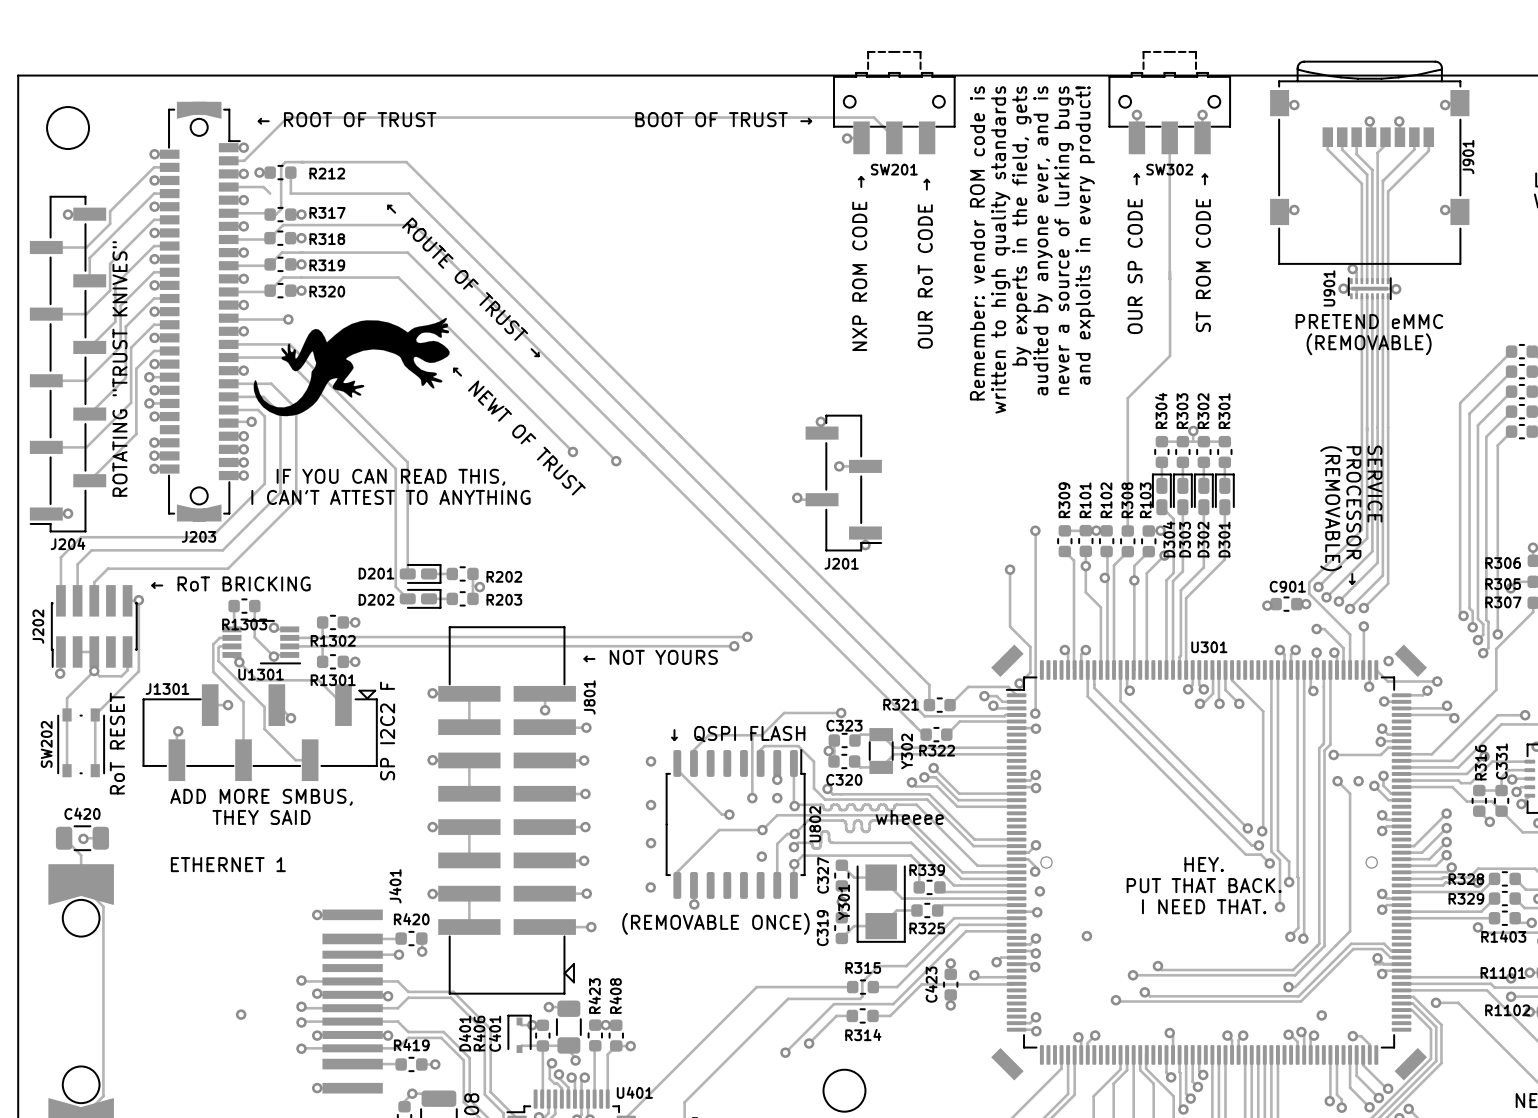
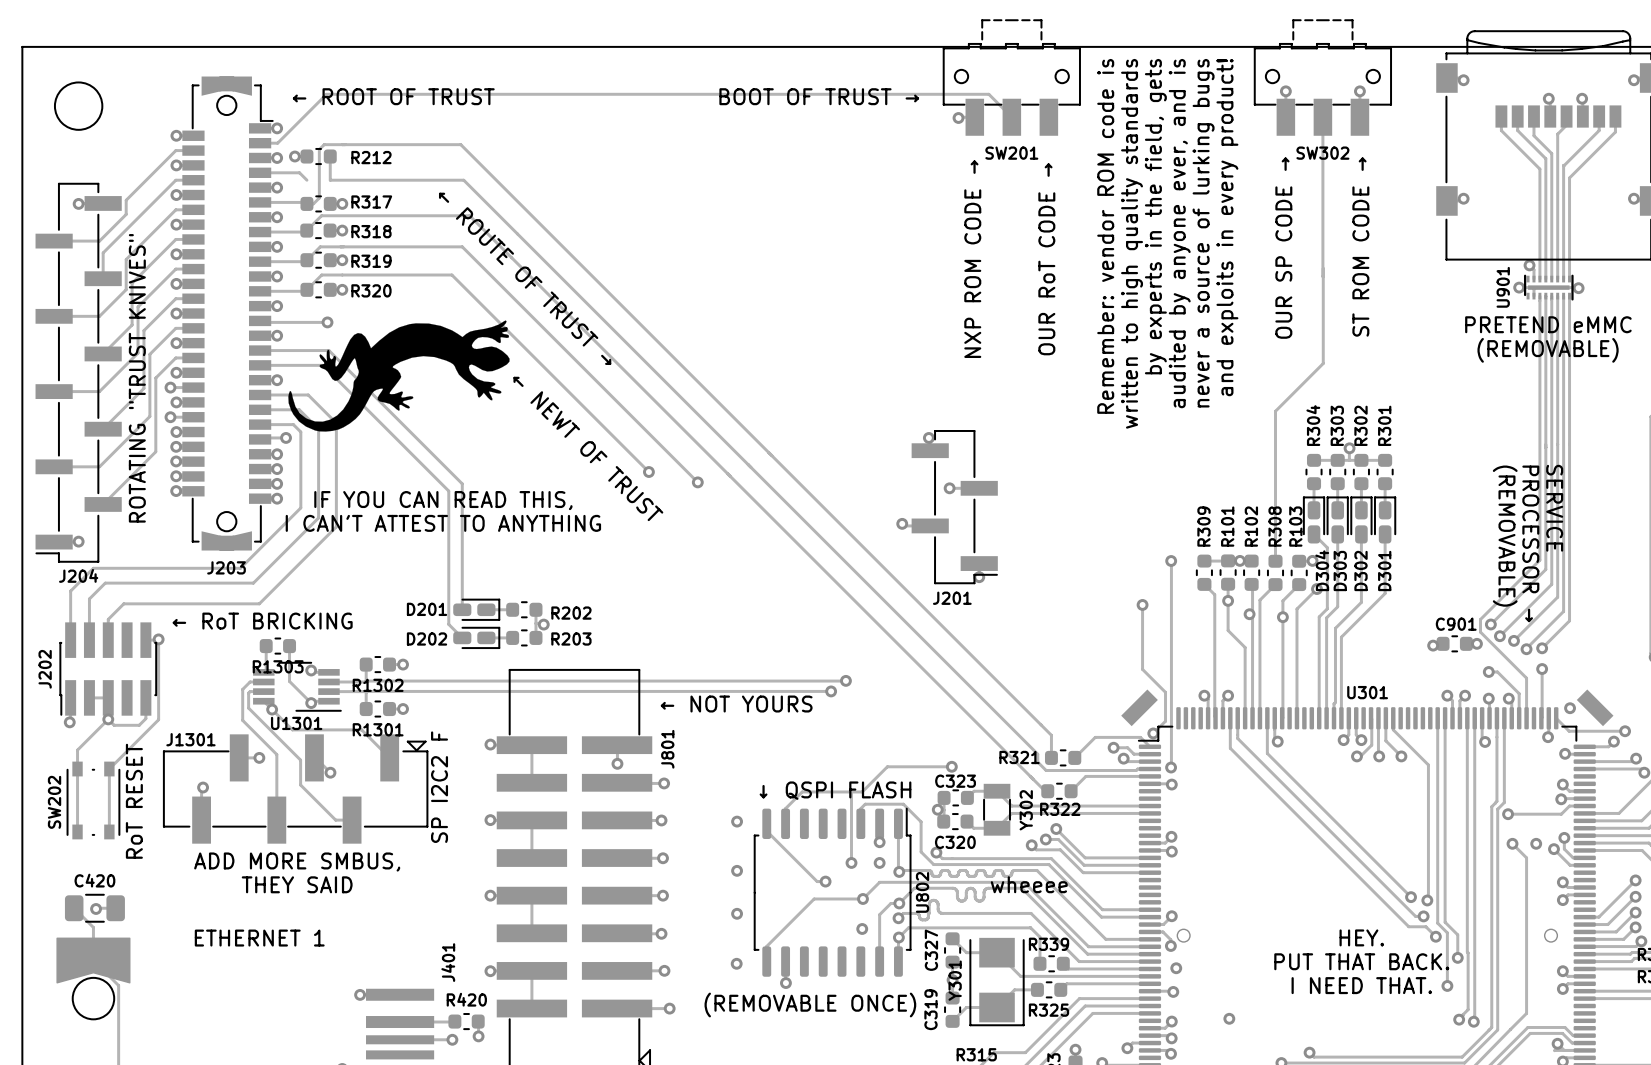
via: none -> (176, 446)

